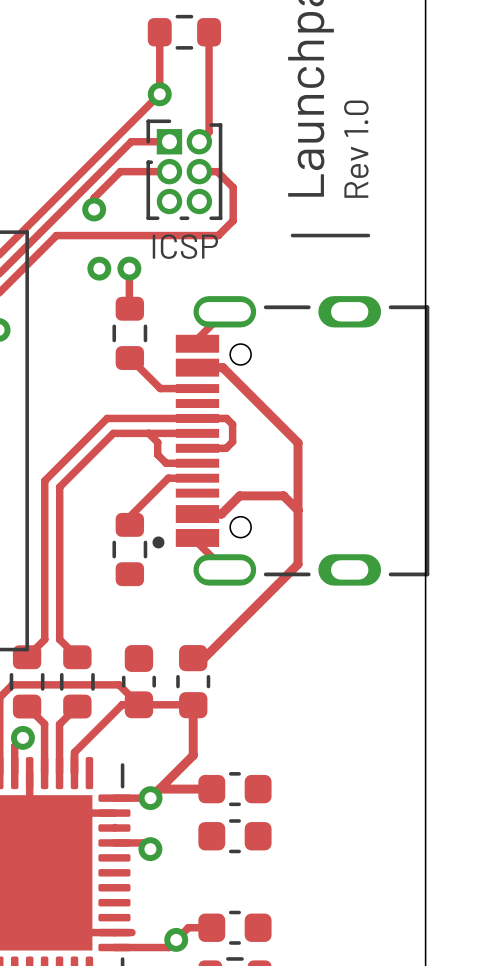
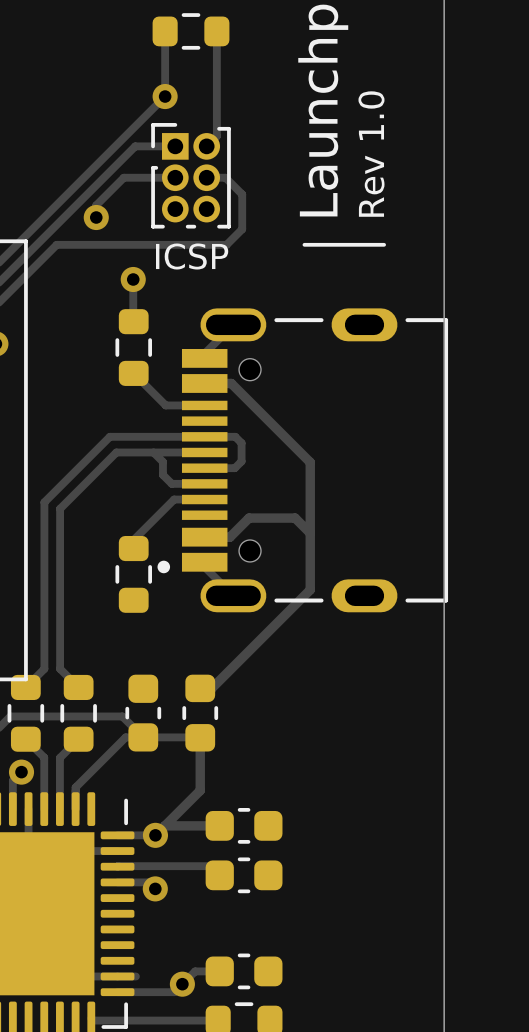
via: (99, 268) -> none
track: none -> (118, 866) (210, 866)

